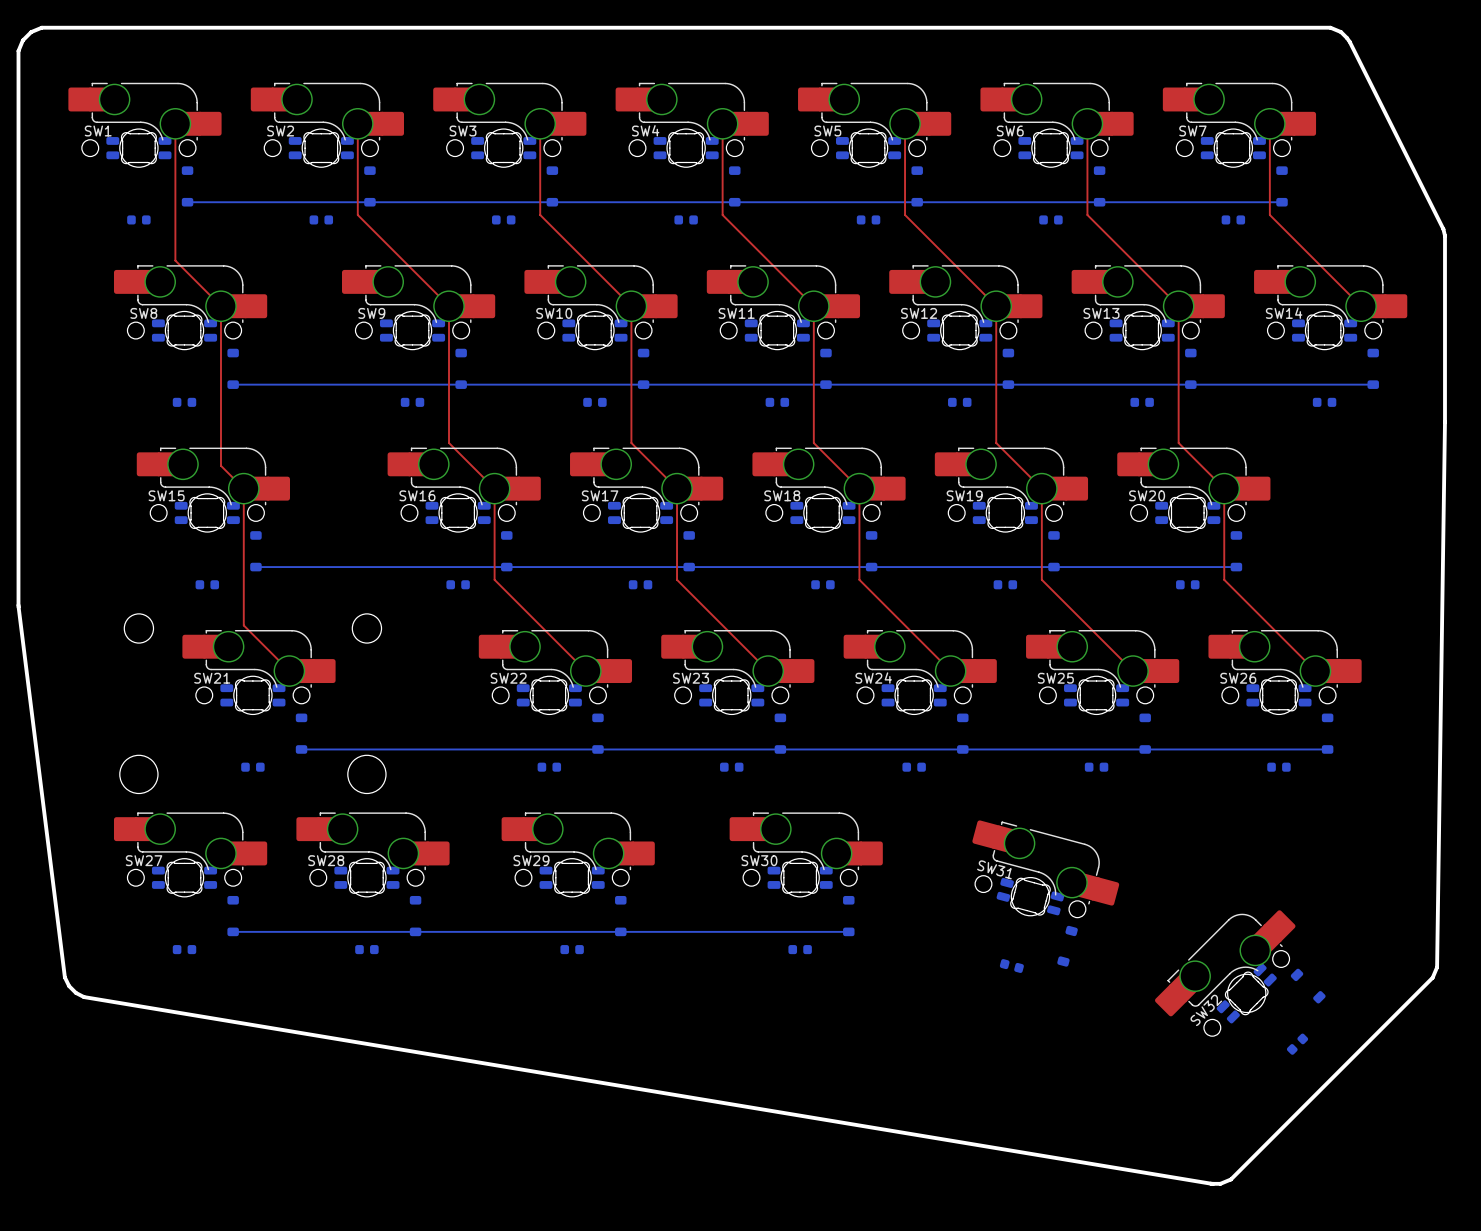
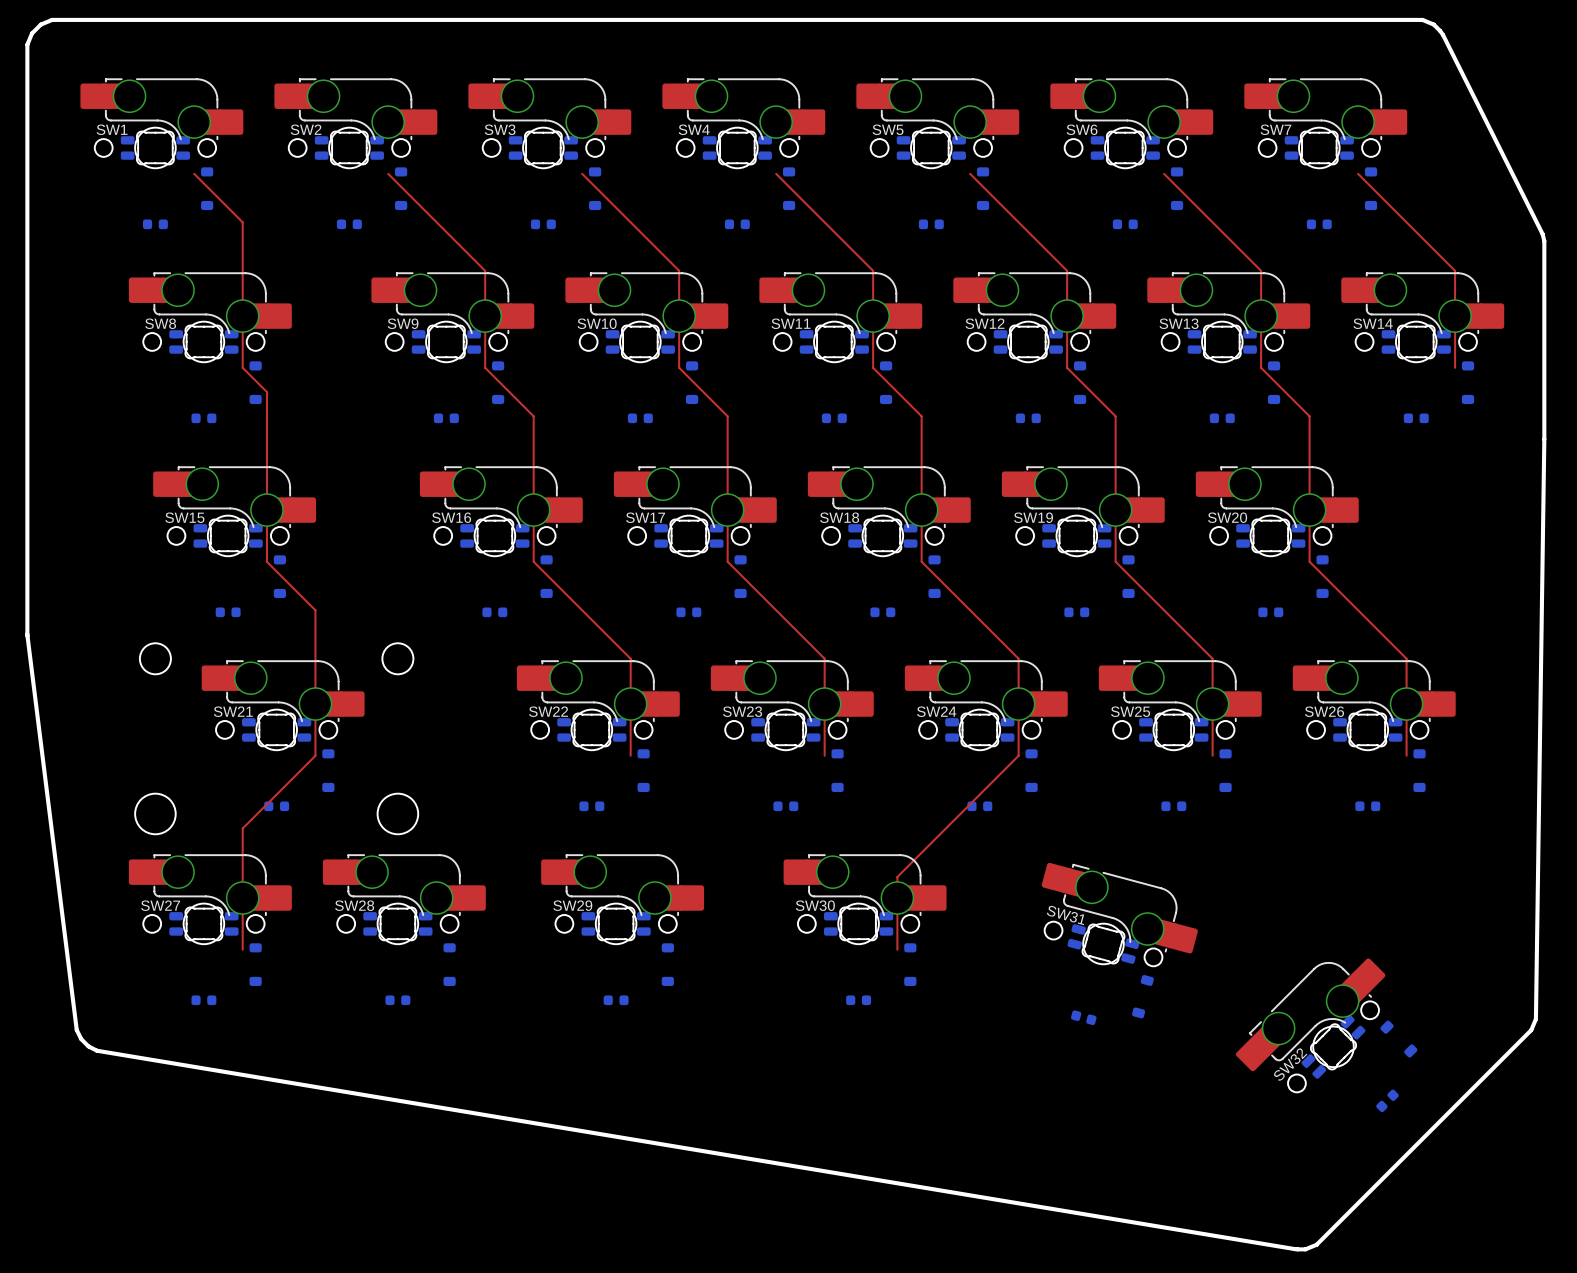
top track: (175, 123) (175, 260) (220, 306) -> (194, 173) (242, 222) (242, 316)
top track: (357, 123) (357, 215) (449, 306) -> (388, 173) (485, 270) (485, 316)
top track: (540, 123) (540, 215) (631, 306) -> (582, 173) (679, 270) (679, 316)
top track: (722, 123) (722, 215) (813, 306) -> (776, 173) (873, 270) (873, 316)
top track: (905, 123) (905, 215) (996, 306) -> (970, 173) (1067, 270) (1067, 316)
top track: (1087, 123) (1087, 215) (1178, 306) -> (1164, 173) (1261, 270) (1261, 316)
top track: (1269, 123) (1269, 215) (1361, 306) -> none
top track: none -> (1358, 173) (1455, 270) (1455, 367)
bottom track: (187, 202) (1282, 202) -> none
top track: (220, 354) (220, 465) (243, 488) -> (242, 367) (266, 392) (266, 510)
top track: (449, 354) (449, 443) (494, 488) -> (485, 367) (533, 416) (533, 510)
top track: (631, 354) (631, 443) (677, 488) -> (679, 367) (727, 416) (727, 510)
top track: (813, 354) (813, 443) (859, 488) -> (873, 367) (921, 416) (921, 510)
top track: (996, 354) (996, 443) (1041, 488) -> (1067, 367) (1115, 416) (1115, 510)
top track: (1178, 354) (1178, 443) (1224, 488) -> (1261, 367) (1309, 416) (1309, 510)
bottom track: (233, 384) (1373, 384) -> none
top track: (243, 537) (243, 625) (289, 671) -> (266, 561) (315, 610) (315, 755) (242, 828) (242, 949)
top track: (494, 537) (494, 579) (585, 671) -> (533, 561) (630, 658) (630, 755)
top track: (677, 537) (677, 579) (768, 671) -> (727, 561) (824, 658) (824, 755)
top track: (859, 537) (859, 579) (950, 671) -> (921, 561) (1018, 658) (1018, 755) (897, 877) (897, 949)
top track: (1041, 537) (1041, 579) (1133, 671) -> (1115, 561) (1212, 658) (1212, 755)
top track: (1224, 537) (1224, 579) (1315, 671) -> (1309, 561) (1406, 658) (1406, 755)
bottom track: (255, 567) (1236, 567) -> none
bottom track: (301, 749) (1327, 749) -> none
bottom track: (233, 931) (848, 931) -> none

